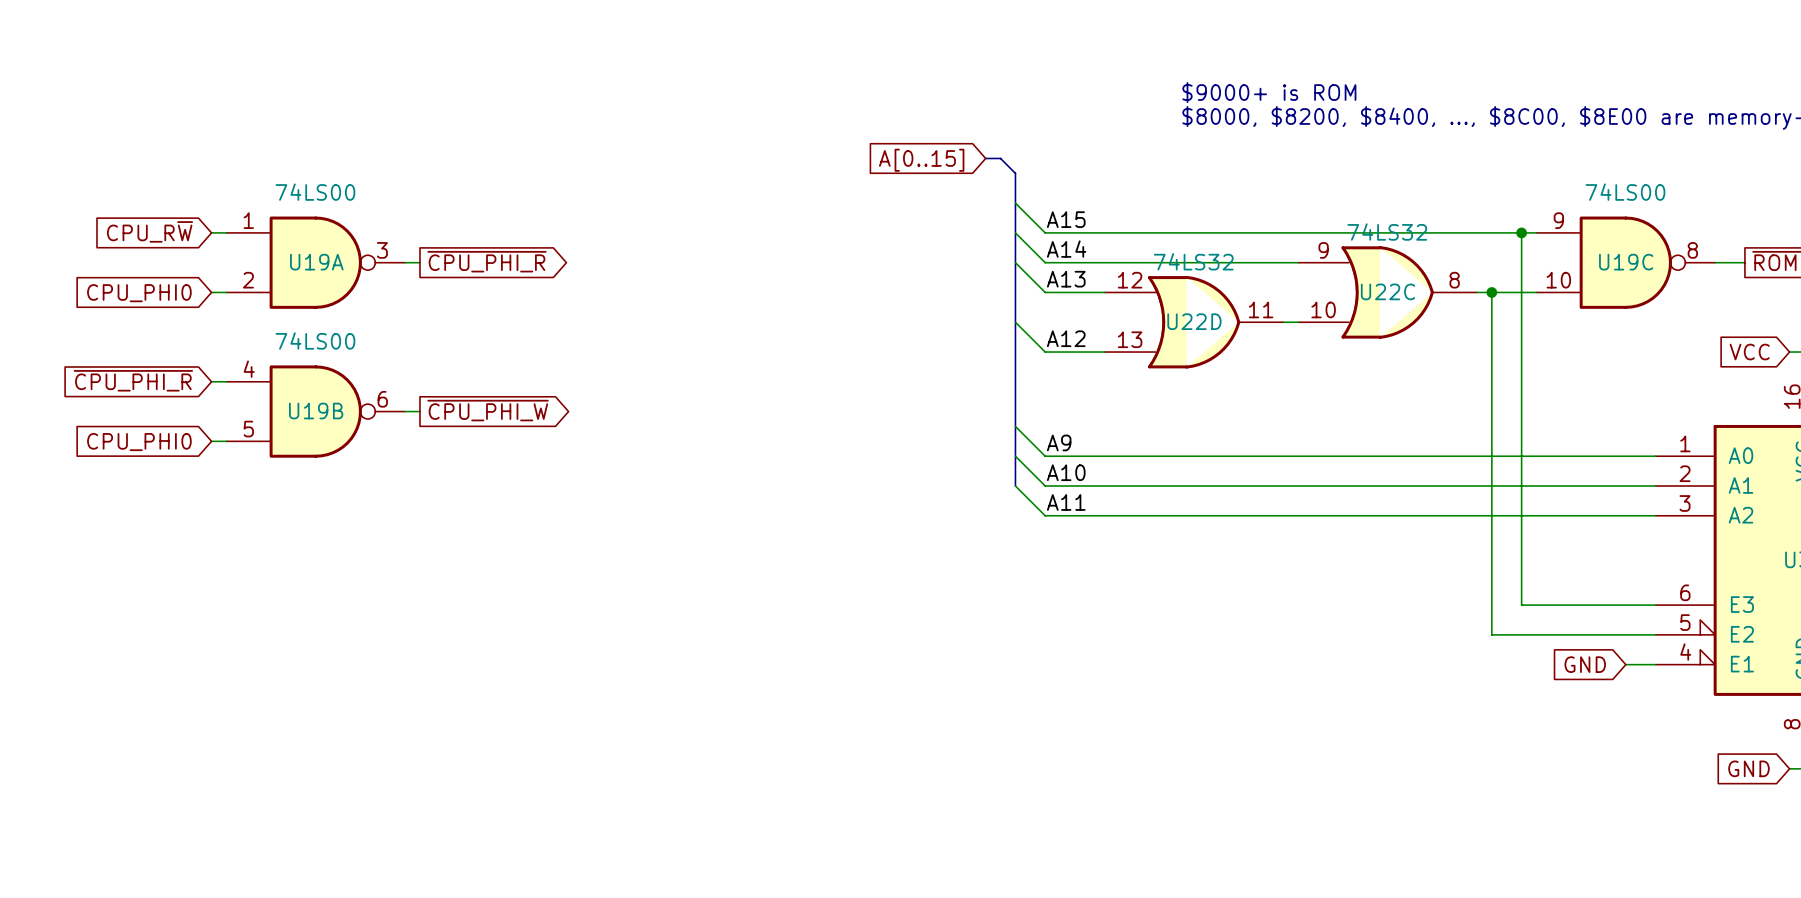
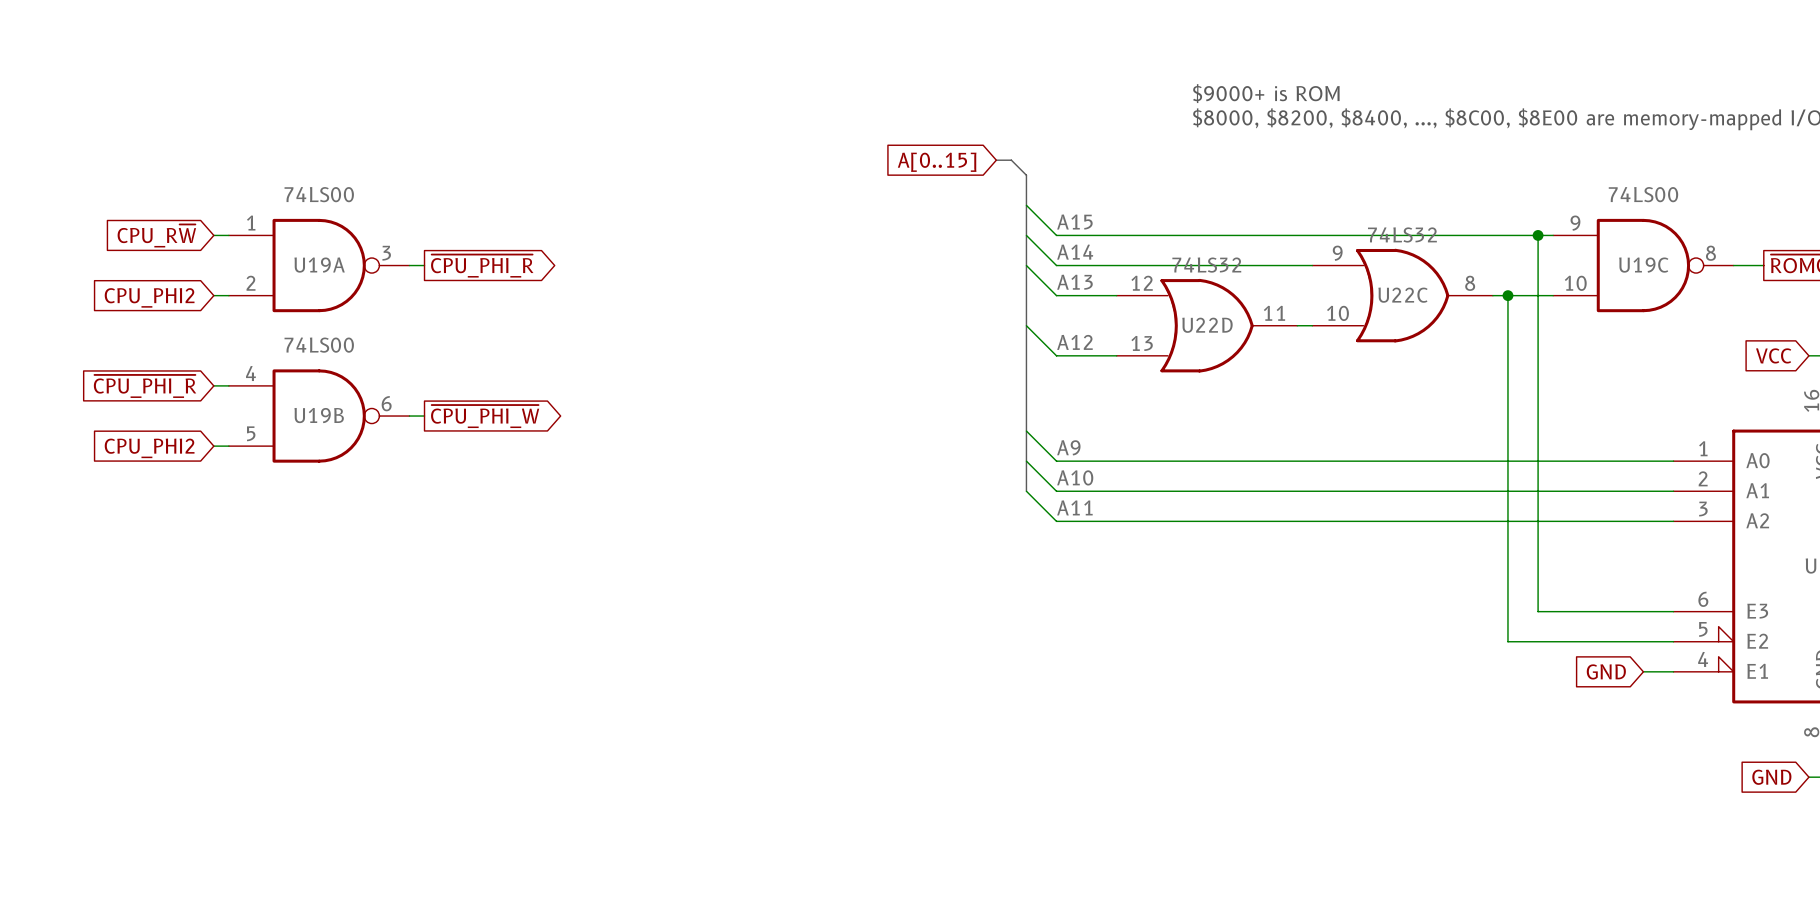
global label: CPU_PHI0 (139, 293) -> CPU_PHI2 (149, 297)
global label: CPU_PHI0 (139, 442) -> CPU_PHI2 (149, 448)

